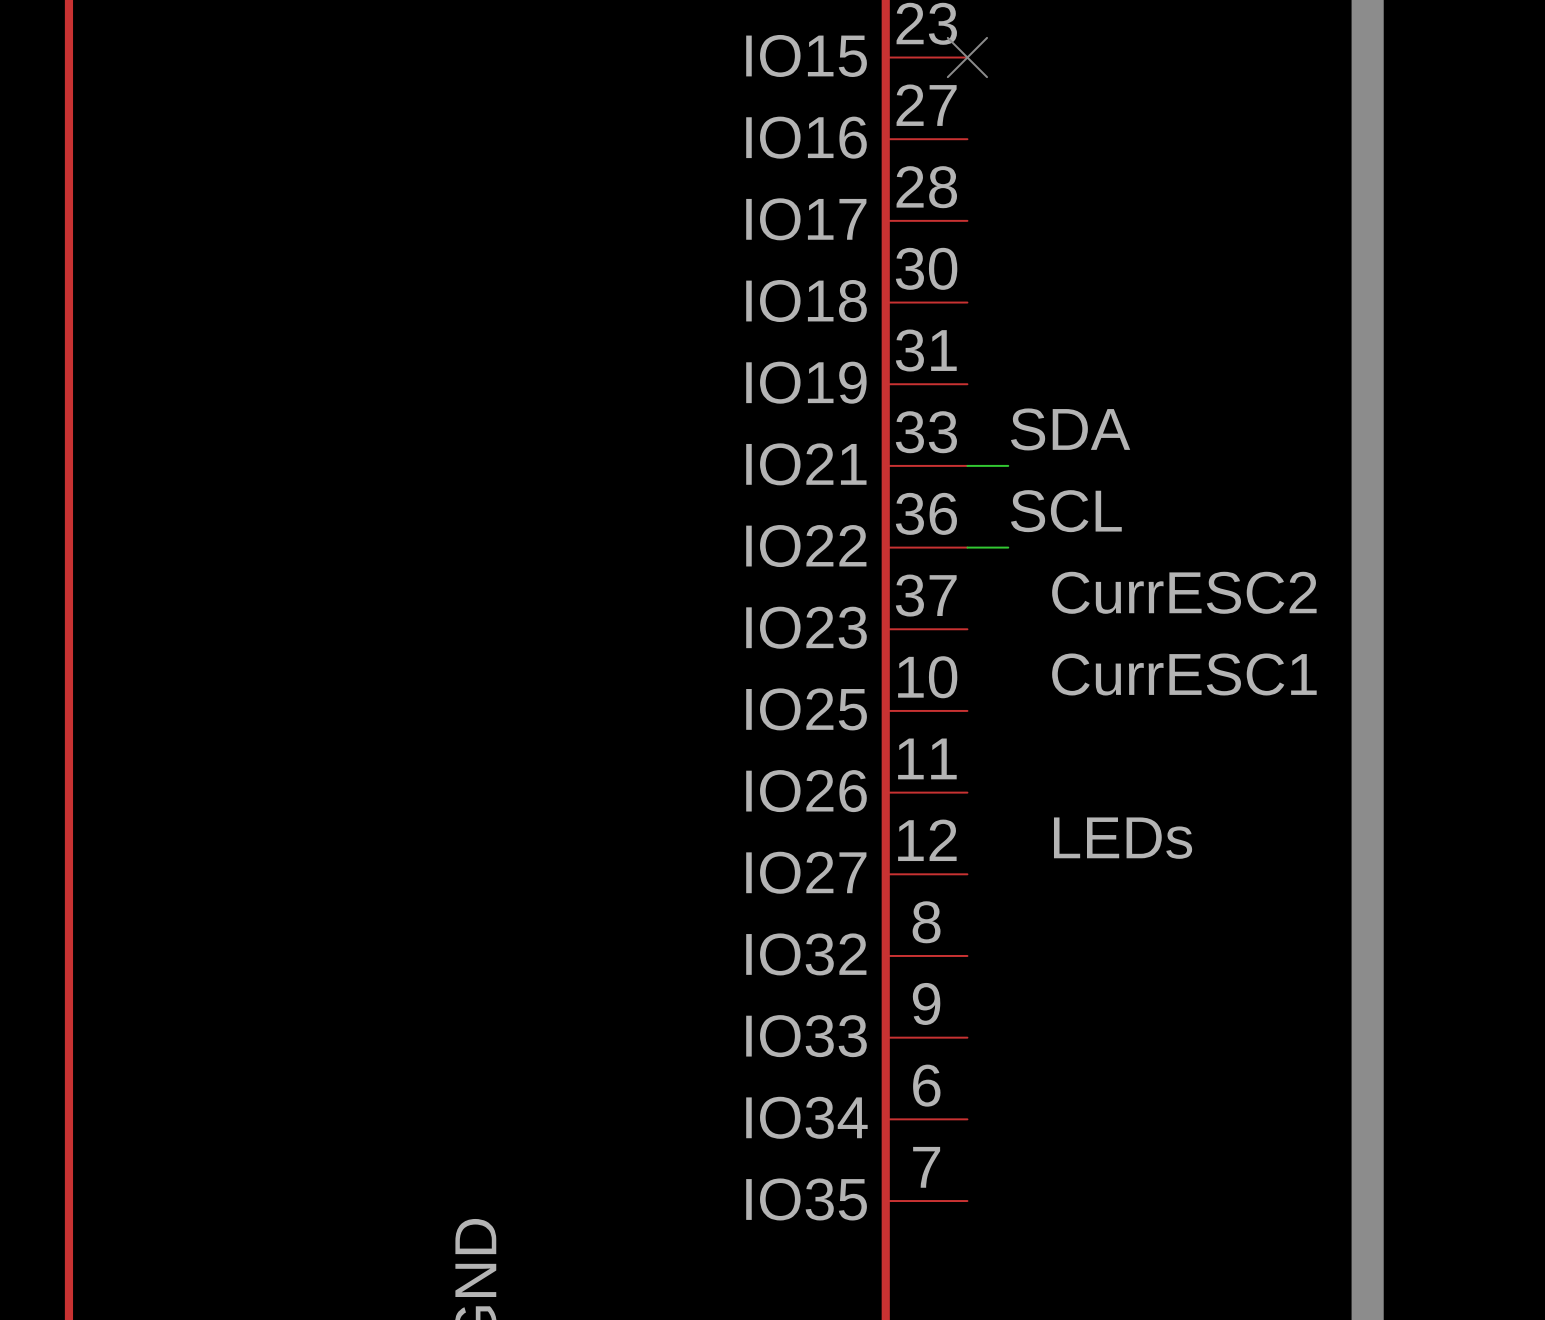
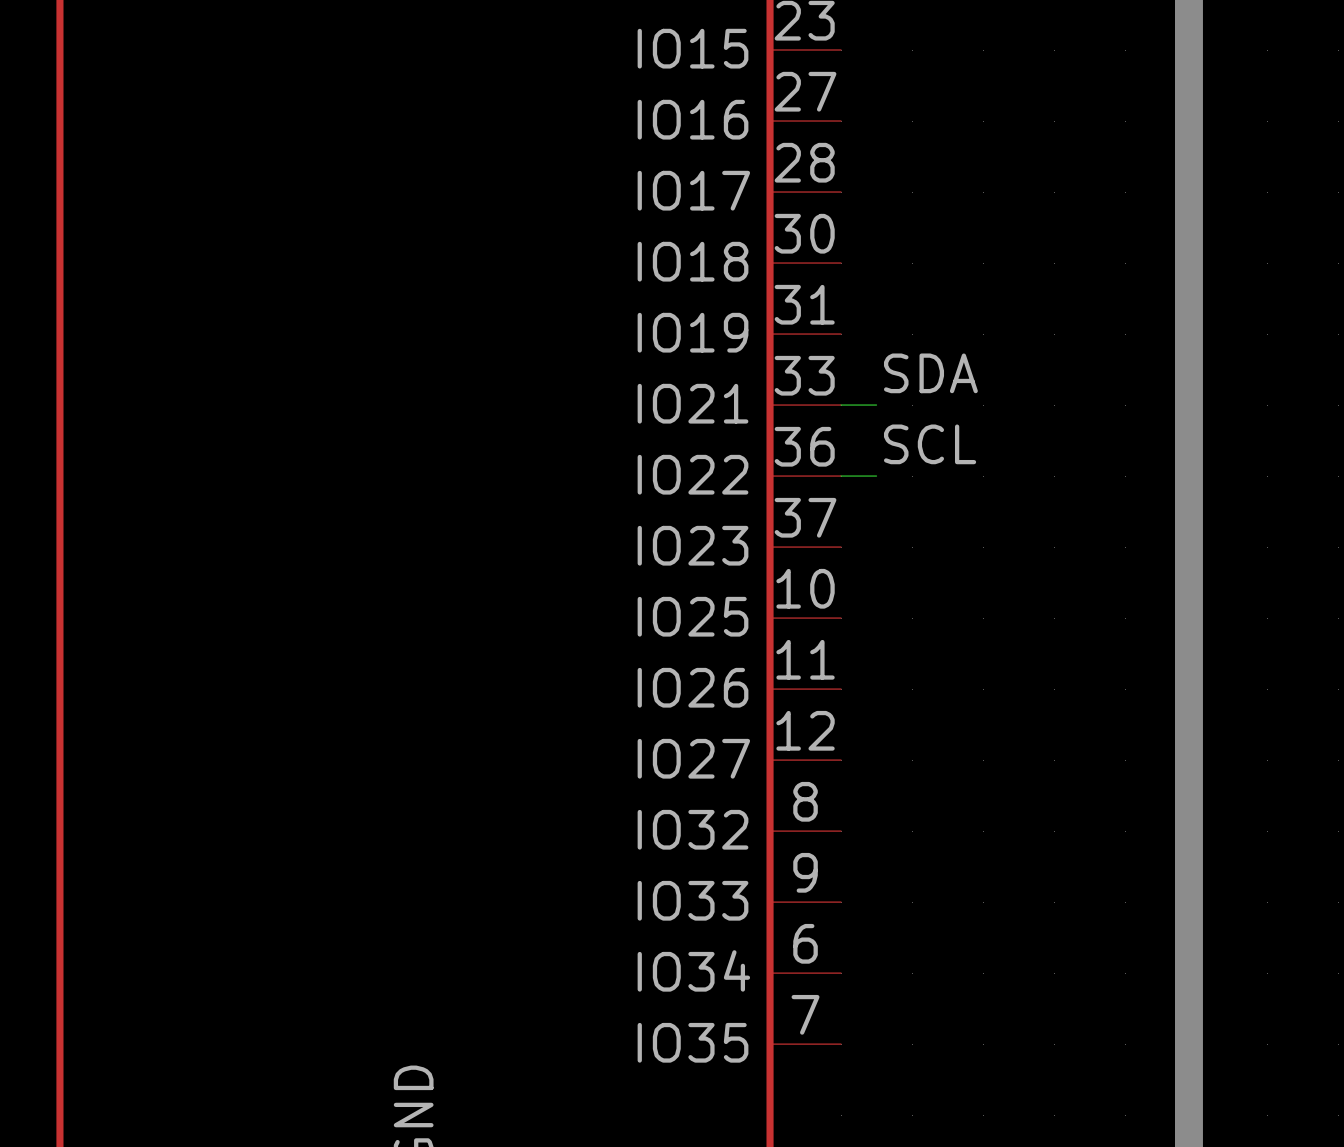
no-connect mark: (967, 57) -> none
label: CurrESC2 (1184, 592) -> none
label: CurrESC1 (1184, 674) -> none
label: LEDs (1123, 838) -> none

